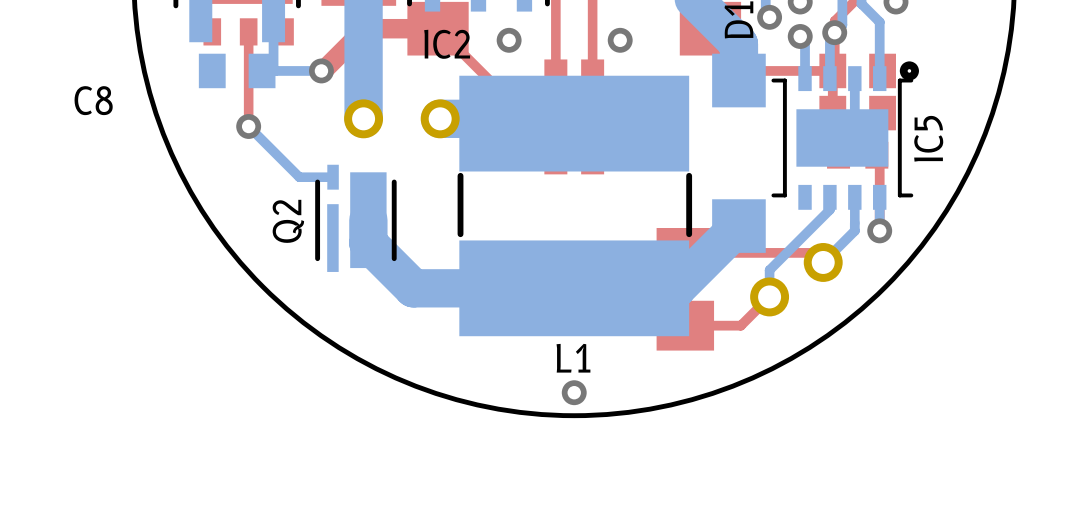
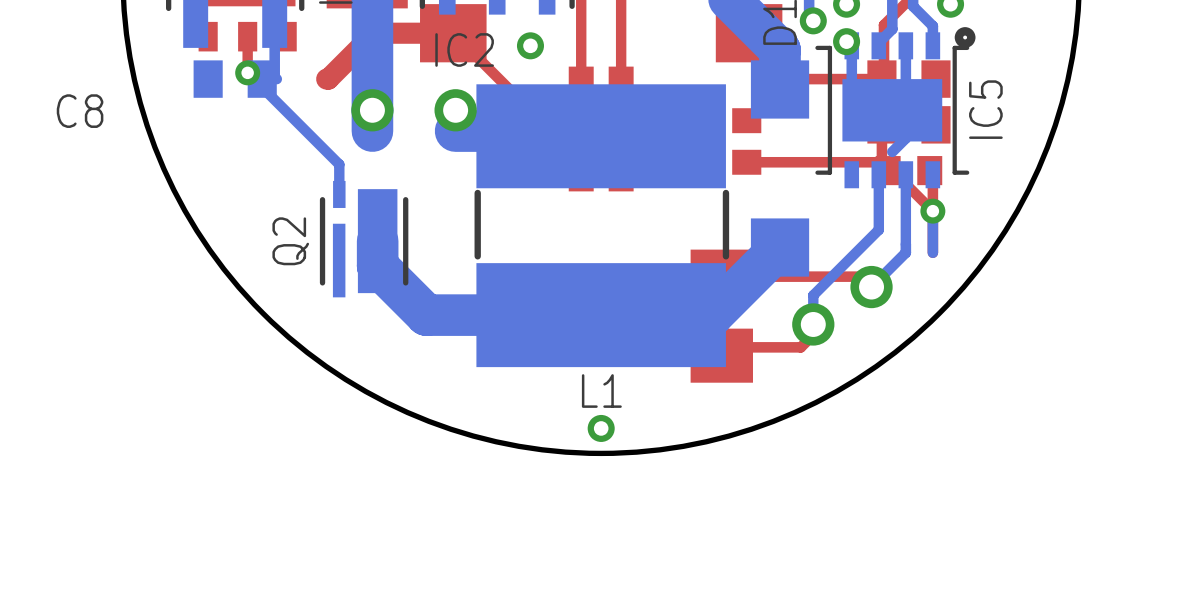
via: (834, 32) -> none
via: (620, 40) -> none
bottom track: (829, 40) (829, 78) -> (878, 174) (878, 216)
bottom track: (879, 40) (879, 78) -> (905, 45) (905, 87)
bottom track: none -> (247, 72) (339, 164) (339, 192)
top track: (248, 65) (248, 126) -> none
via: none -> (247, 72)
bottom track: (321, 70) (262, 70) -> none
via: (321, 70) -> none
part position: (363, 118) -> (372, 110)
part position: (440, 118) -> (455, 110)
bottom track: (248, 126) (299, 177) (333, 177) -> none
via: (248, 126) -> none
part: none -> (746, 141)
IC5 position: (845, 135) -> (895, 107)
top track: none -> (746, 162) (884, 162) (932, 211)
bottom track: none -> (905, 174) (905, 216)
via: none -> (932, 211)
via: (879, 230) -> none
top track: (769, 296) (740, 325) (685, 325) -> none
top track: none -> (809, 339) (800, 347) (721, 347)

